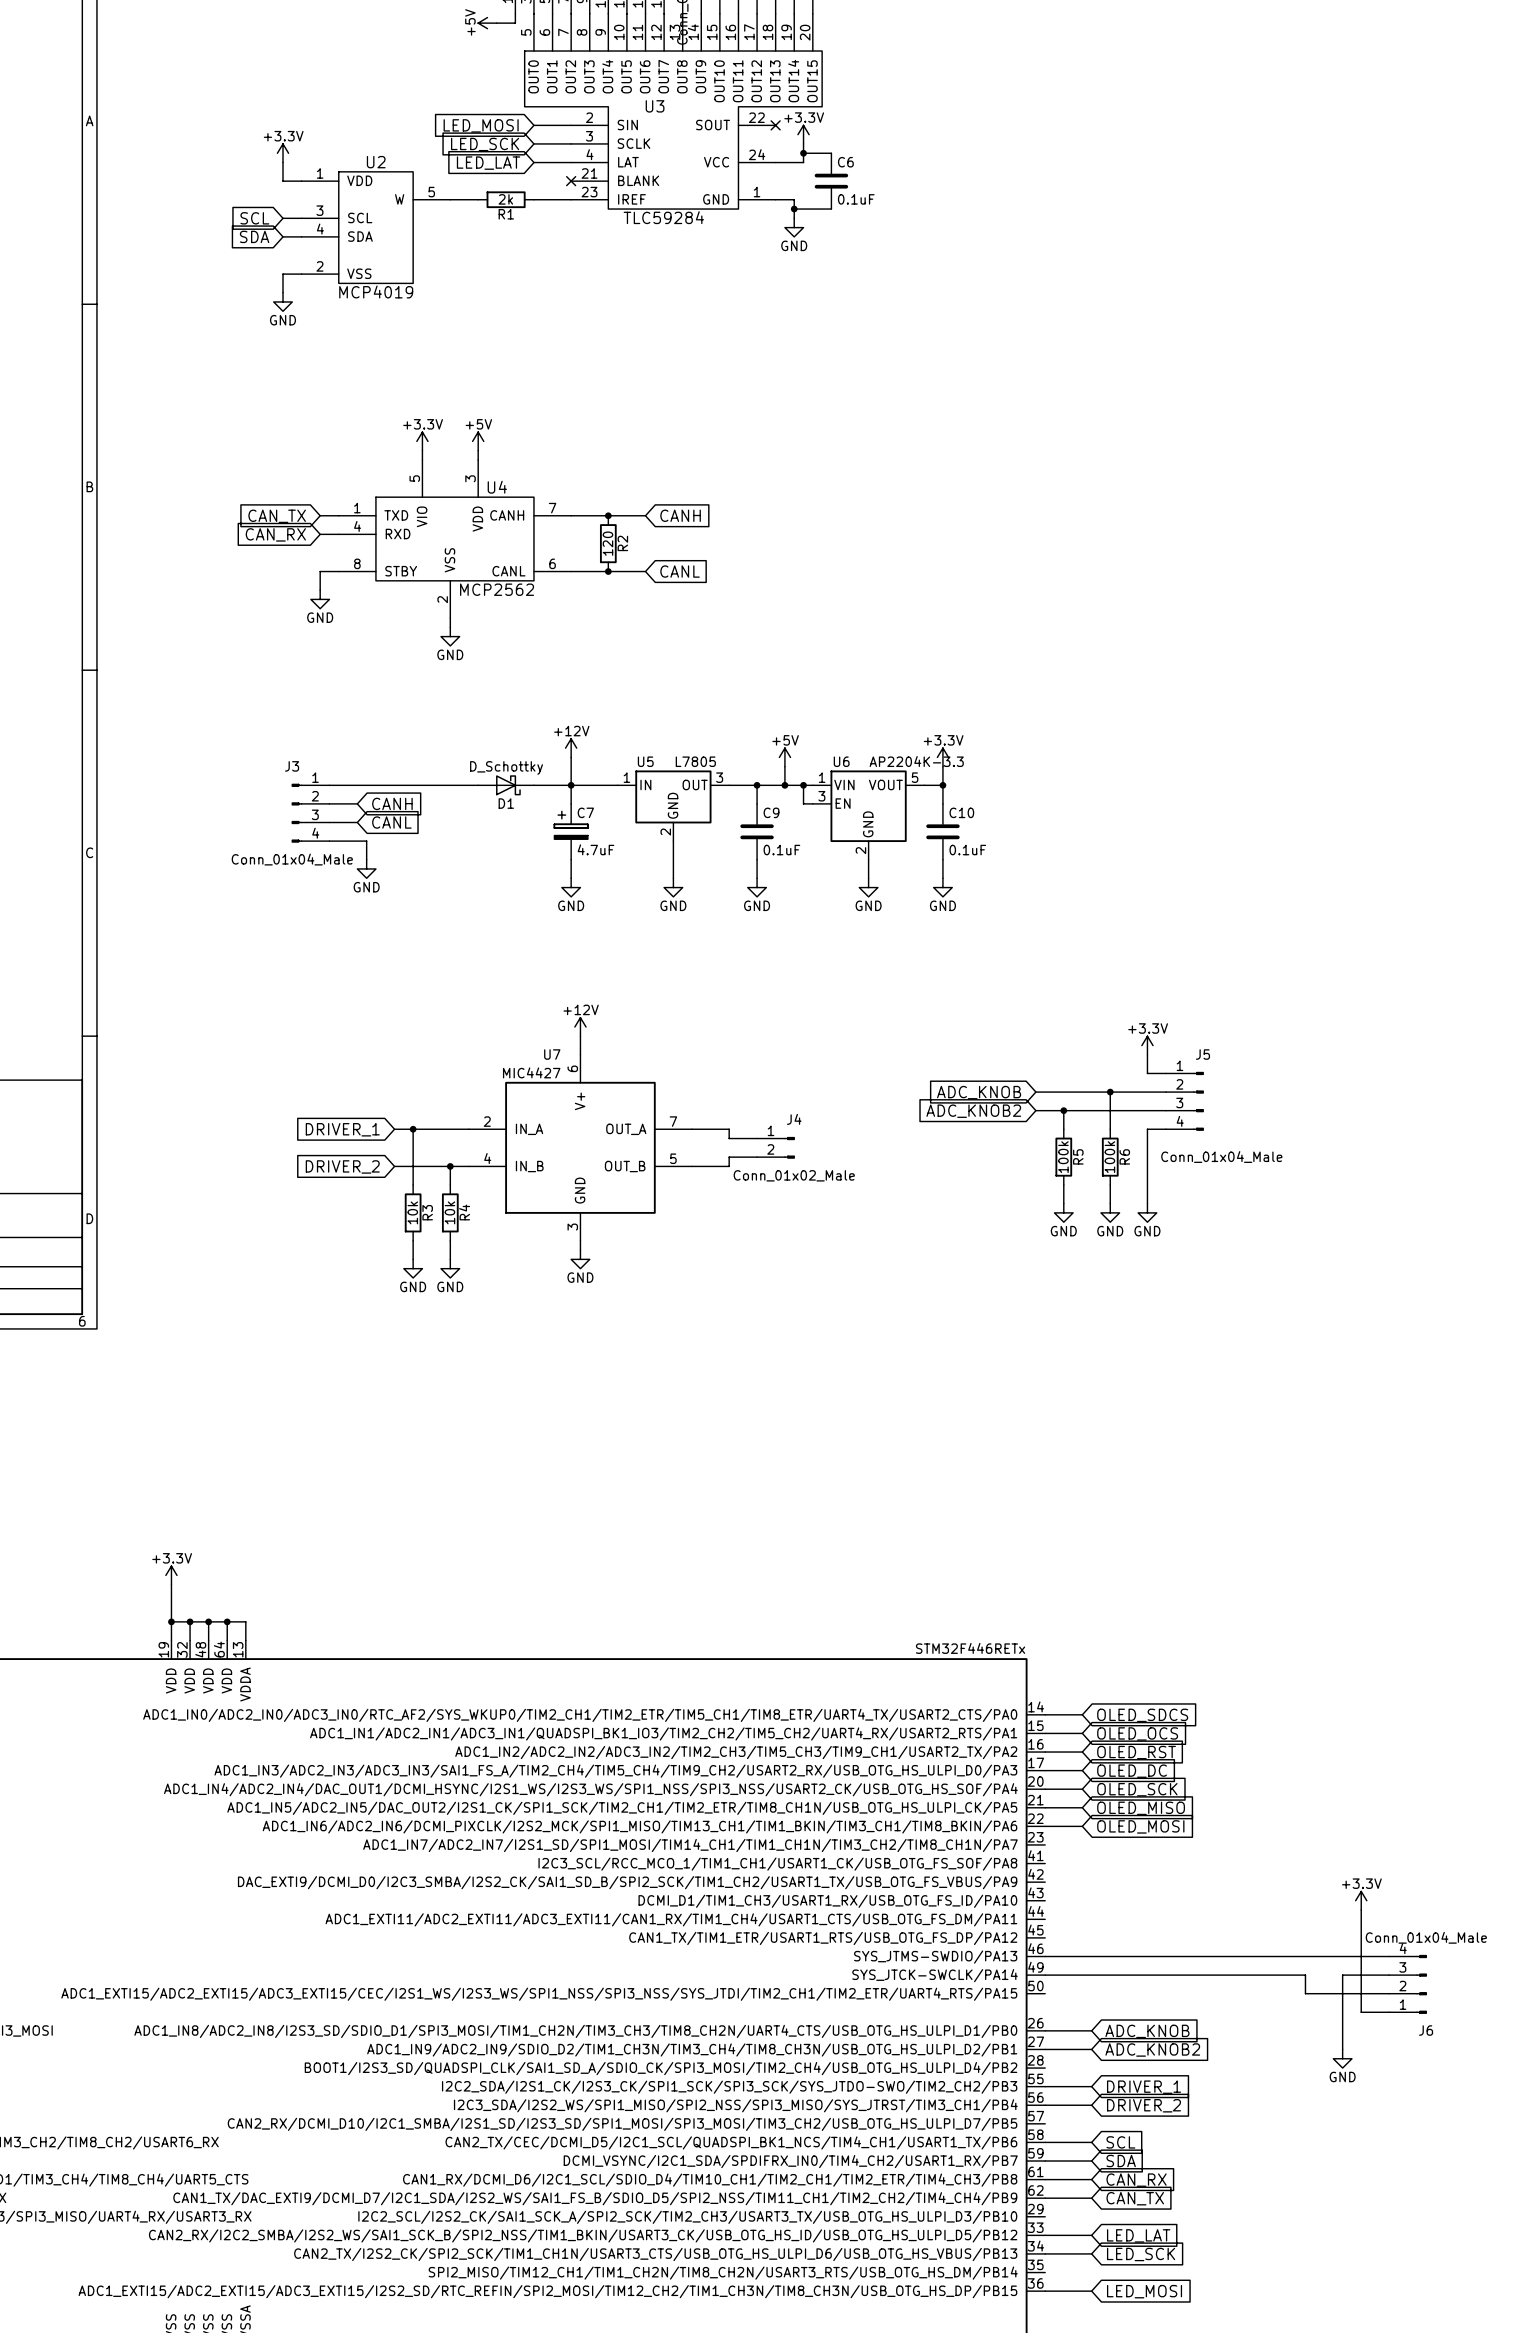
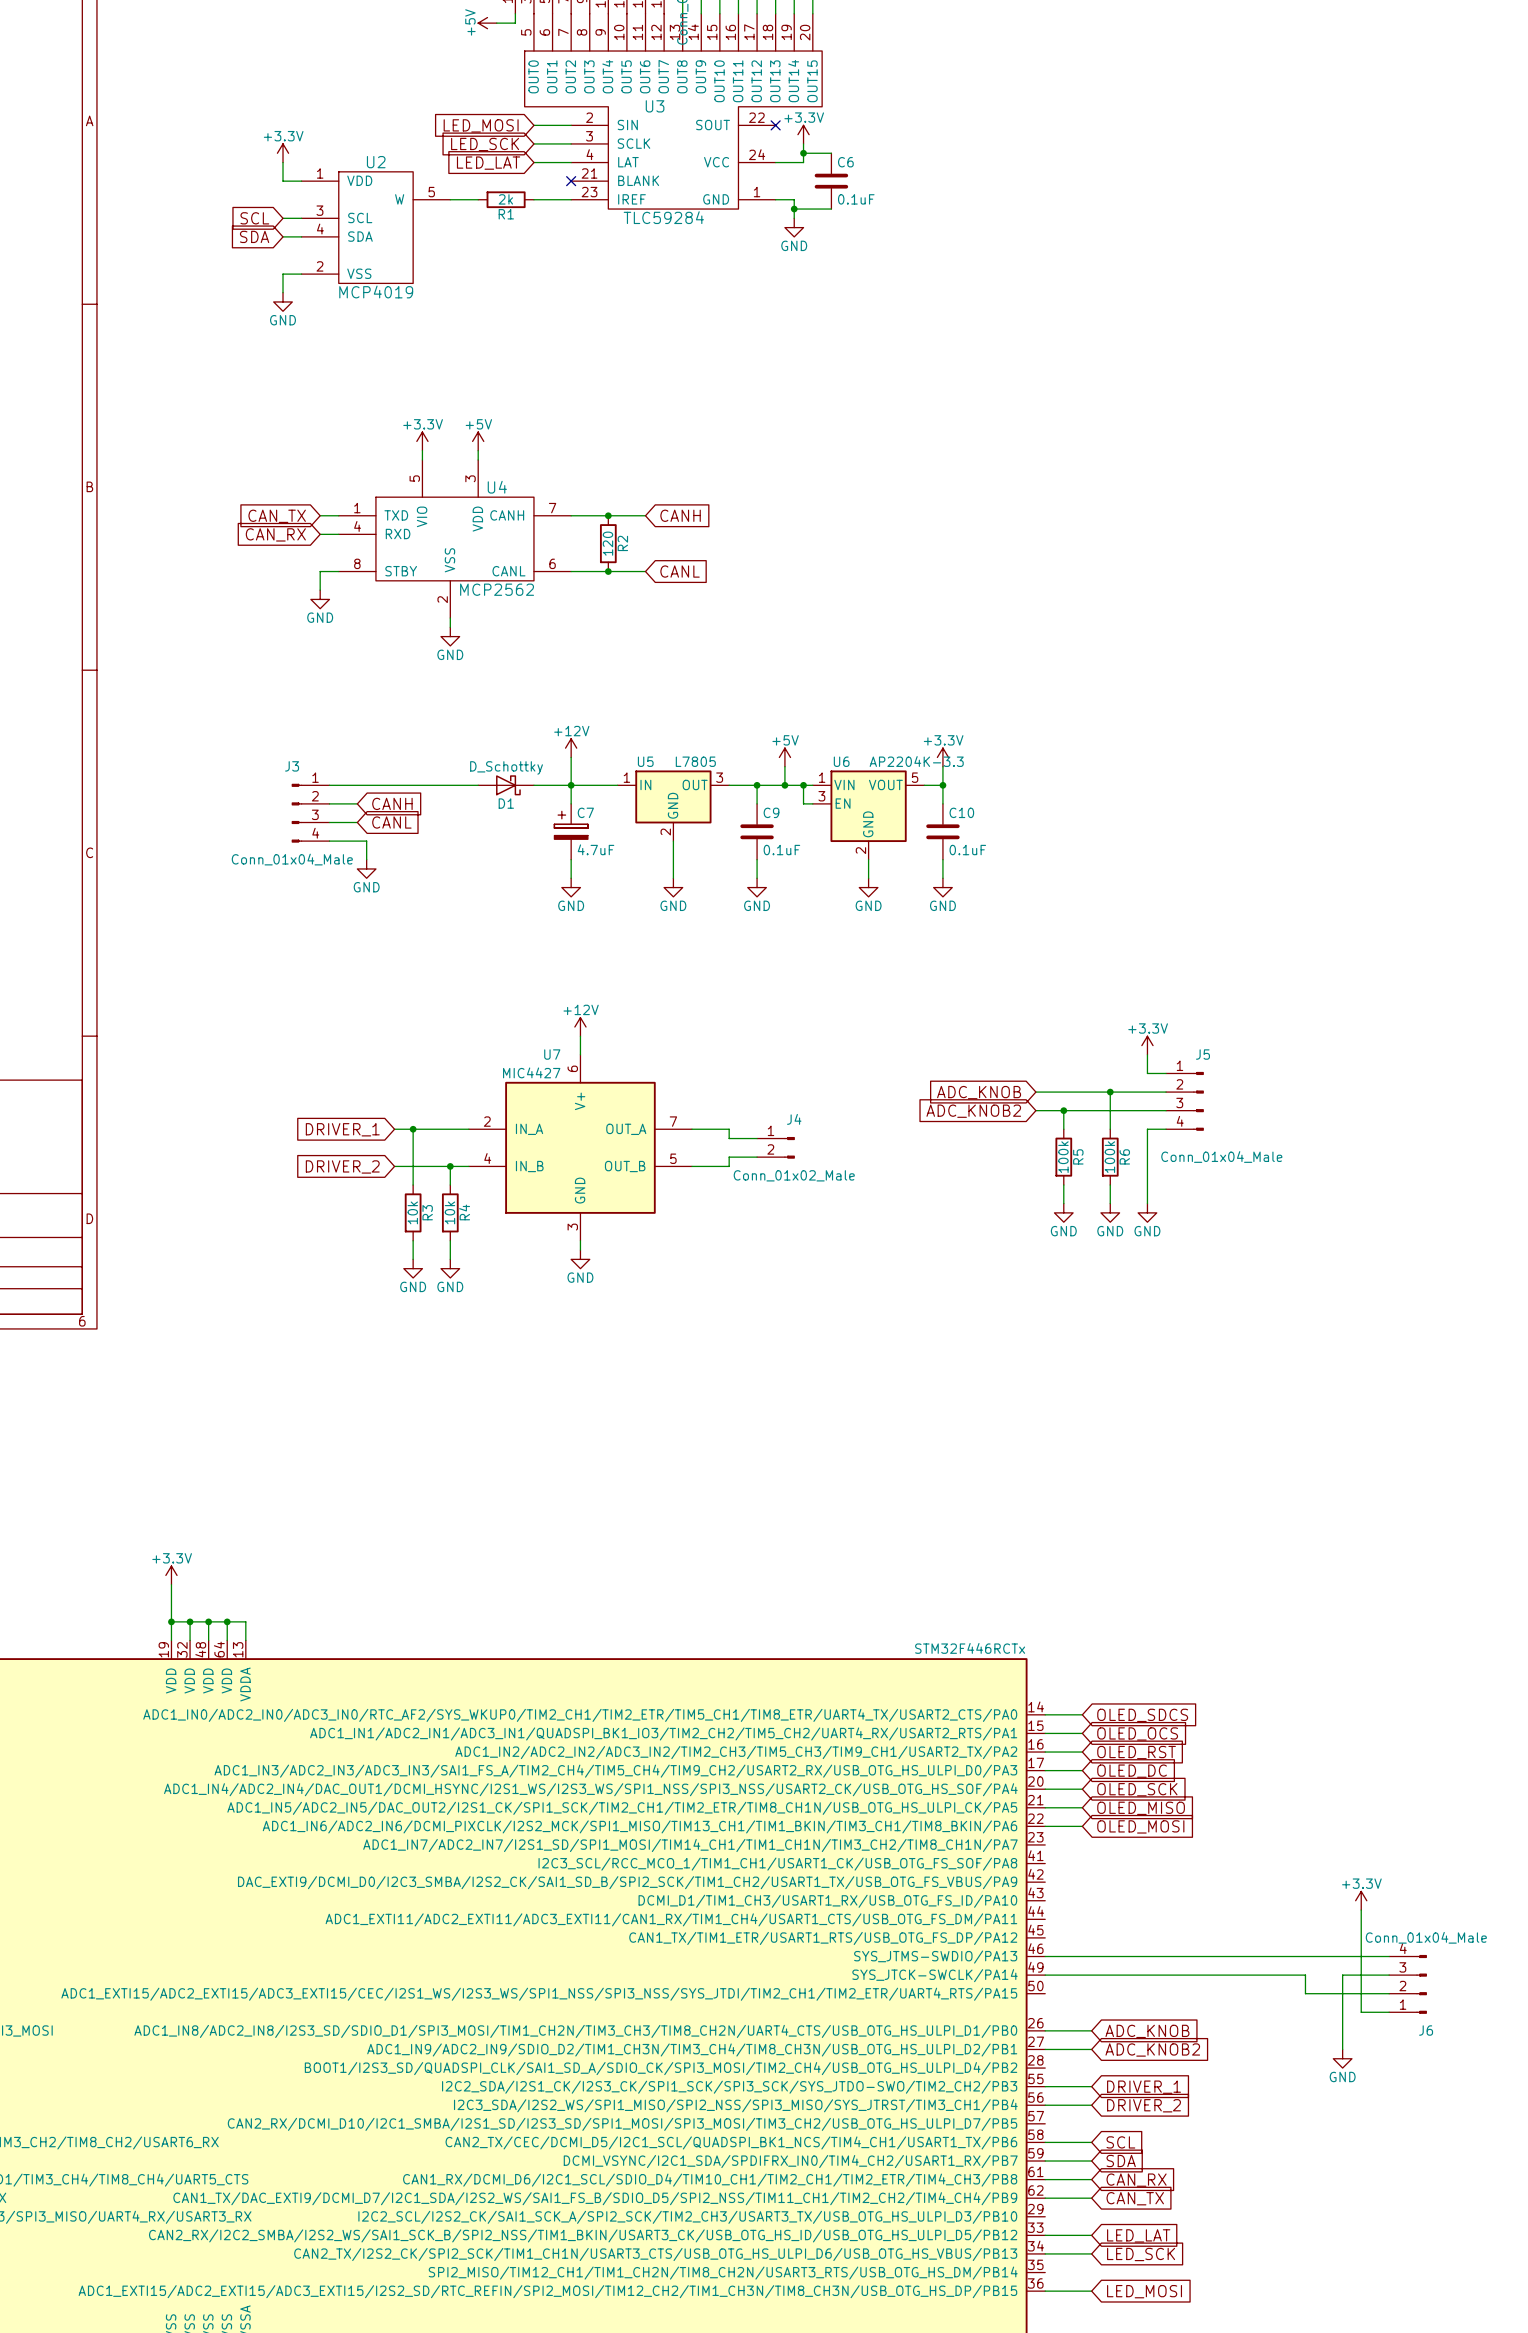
part value: STM32F446RETx (970, 1648) -> STM32F446RCTx (970, 1648)

